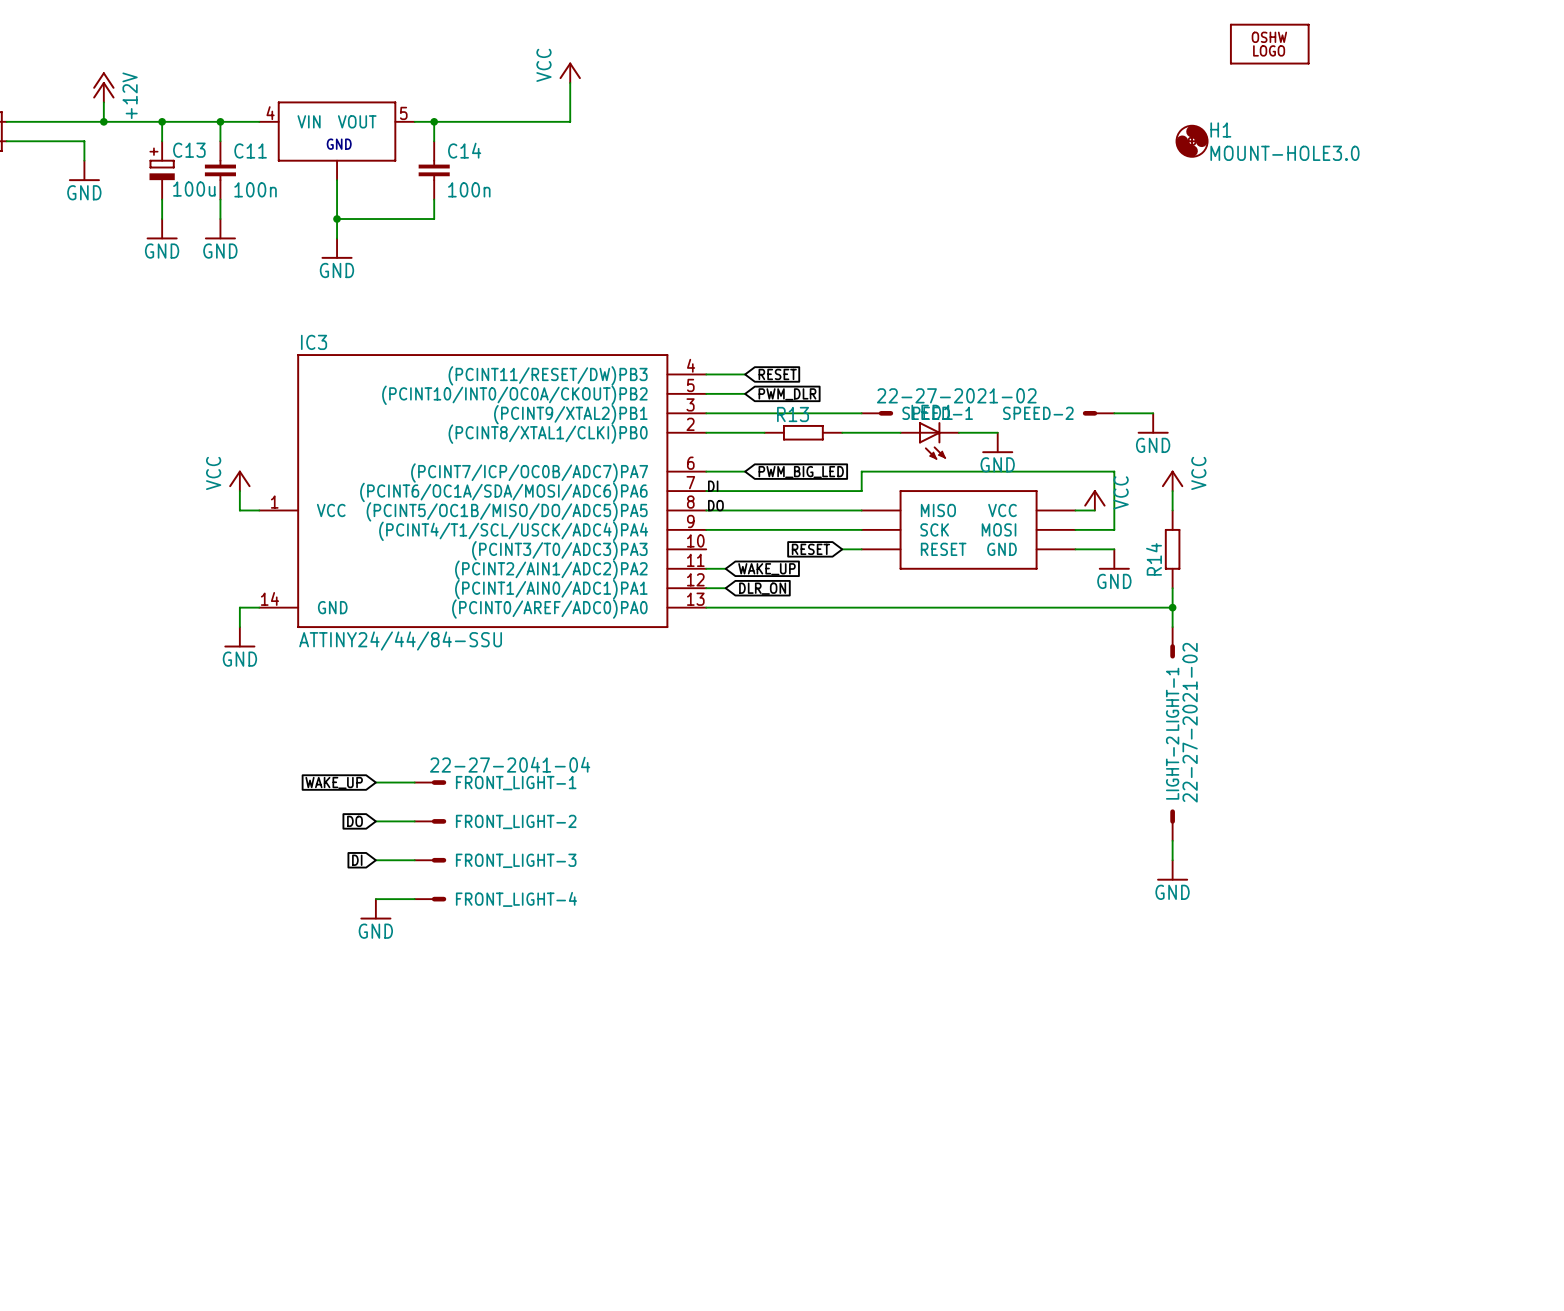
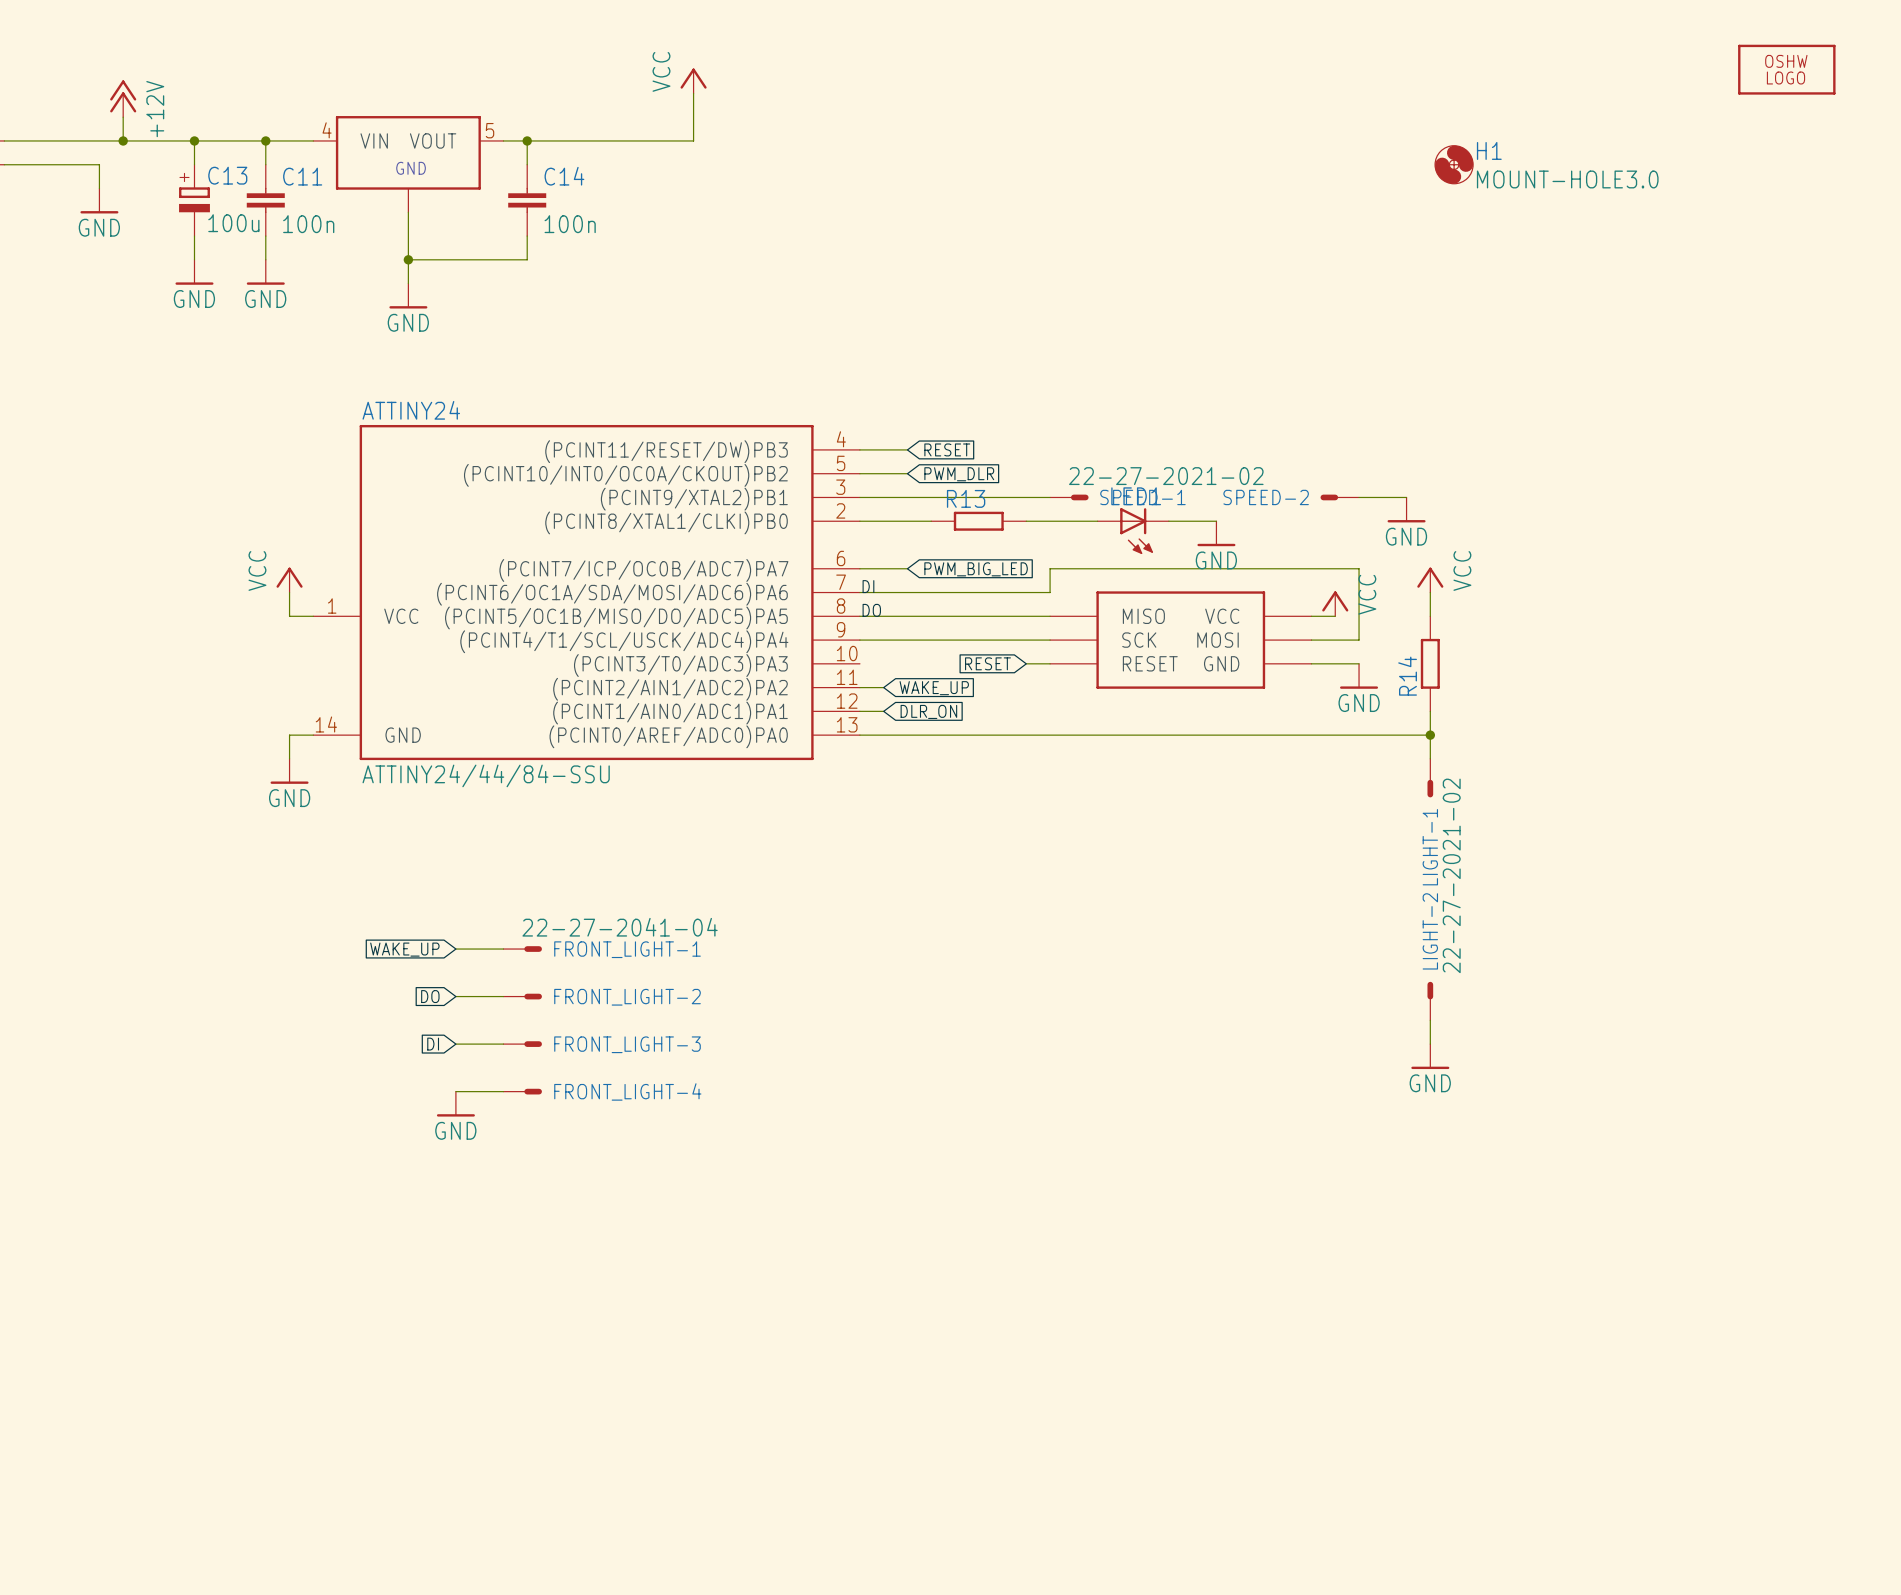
part: (1269, 44) -> none
part: none -> (1786, 69)
IC3 name: IC3 (314, 342) -> ATTINY24 (411, 410)

